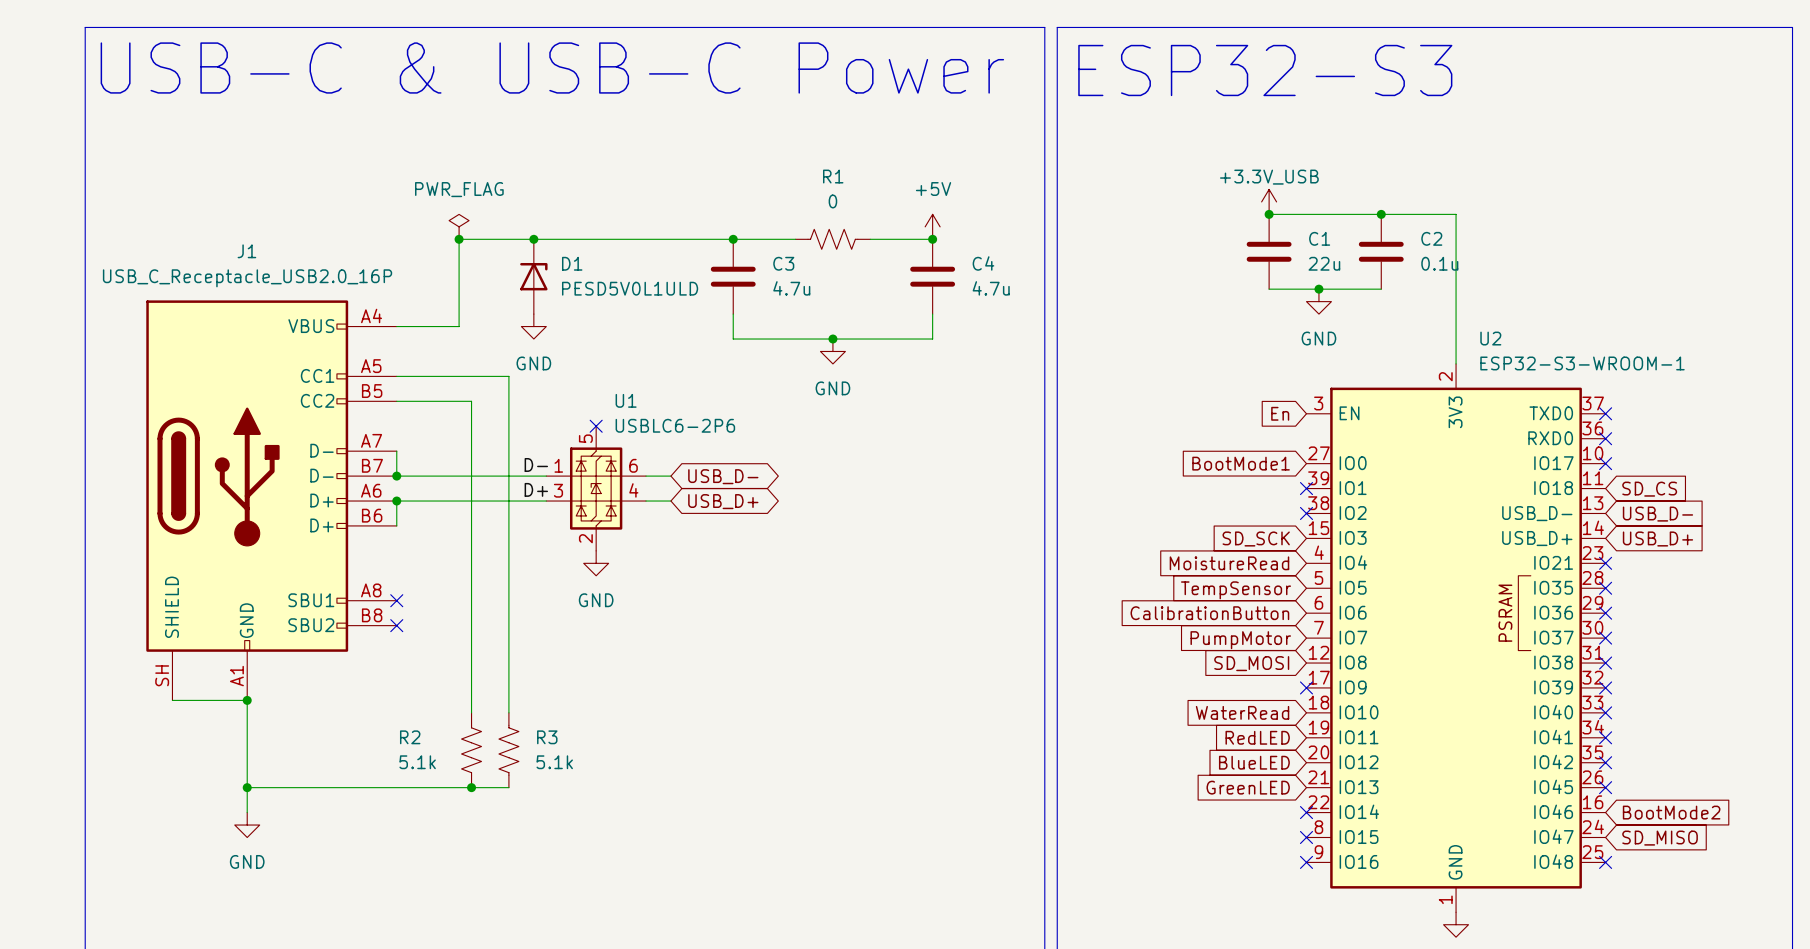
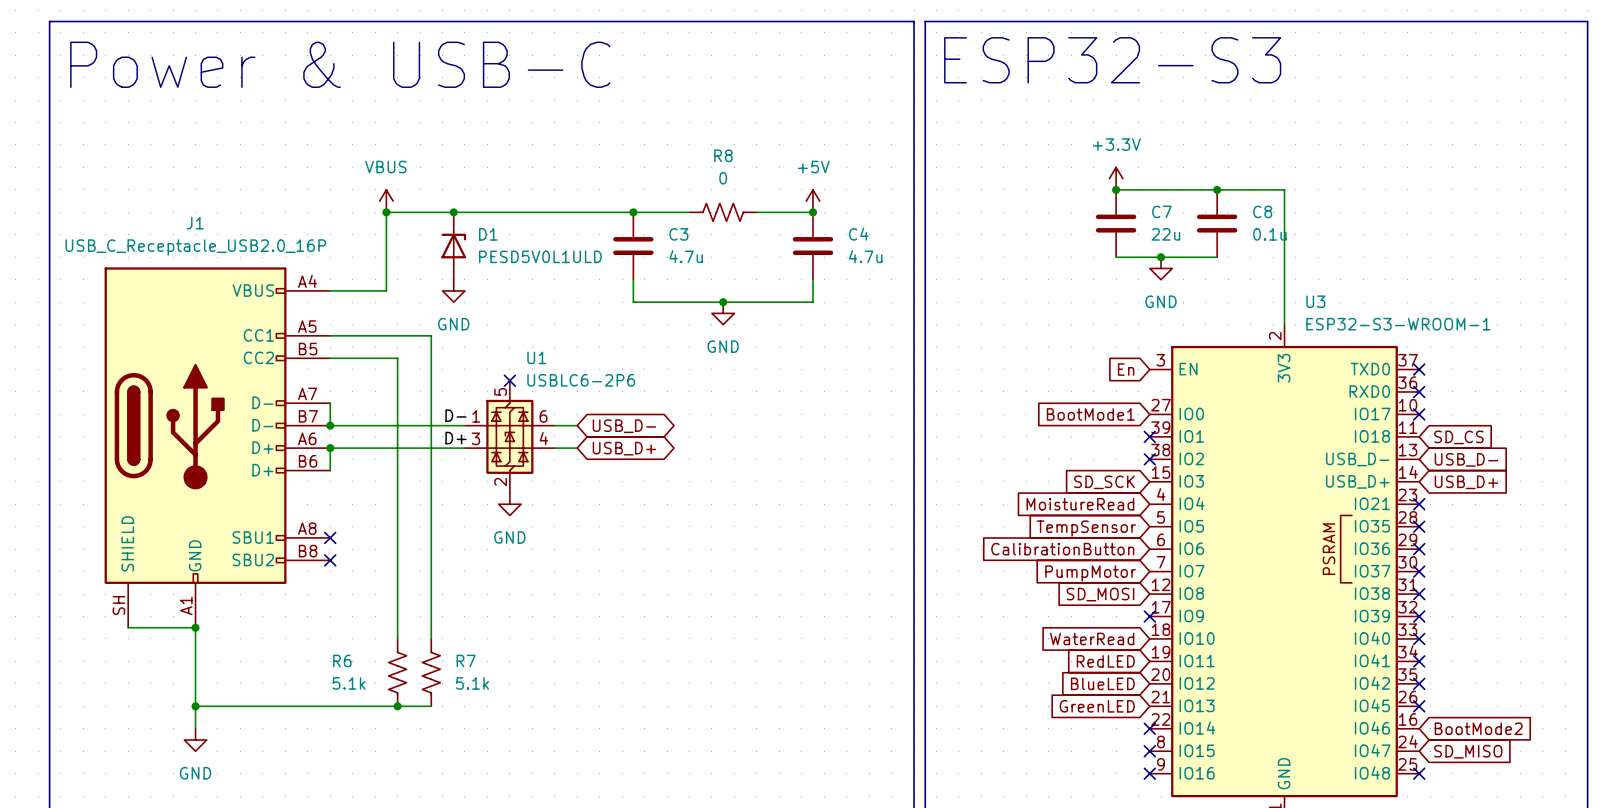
text: USB-C & USB-C Power (552, 68) -> none
text: none -> Power & USB-C (340, 64)
R1 name: R1 (833, 176) -> R8 (723, 155)
power symbol: +3.3V_USB (1269, 201) -> +3.3V (1116, 178)
power symbol: PWR_FLAG (459, 226) -> VBUS (386, 201)
C1 name: C1 (1319, 238) -> C7 (1161, 211)
C2 name: C2 (1431, 238) -> C8 (1262, 211)
U2 name: U2 (1490, 338) -> U3 (1315, 301)
R2 name: R2 (410, 737) -> R6 (342, 660)
R3 name: R3 (547, 737) -> R7 (466, 660)

